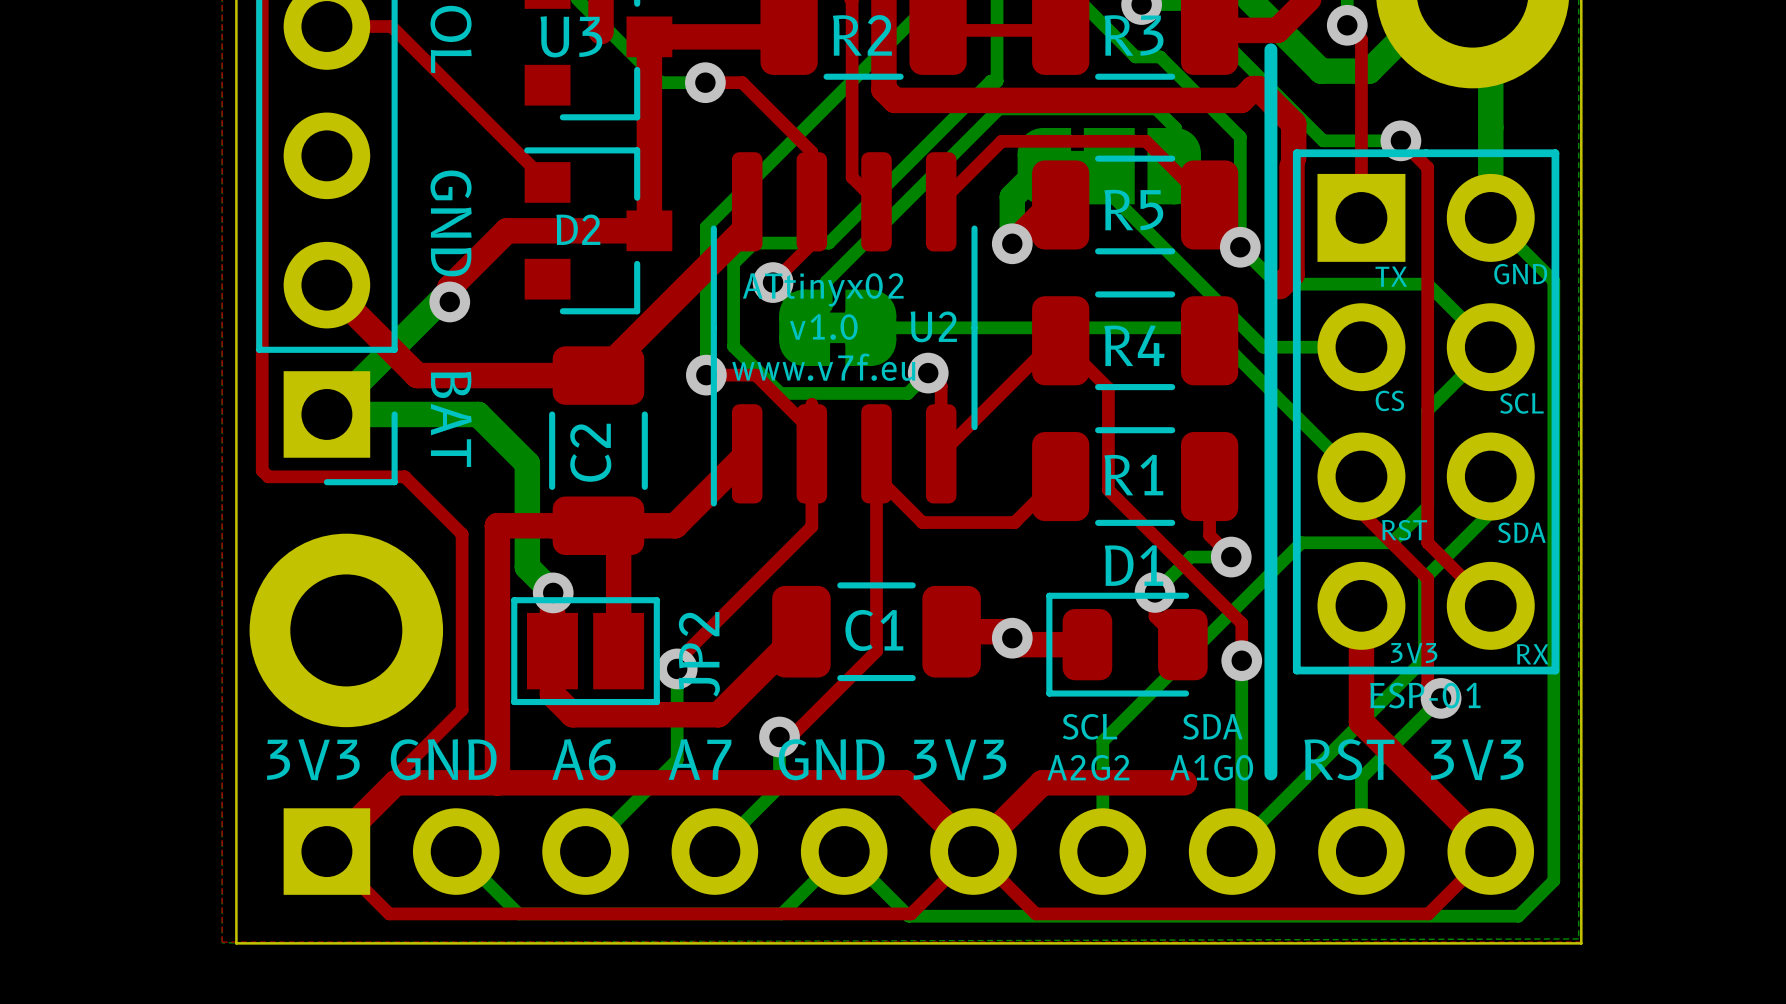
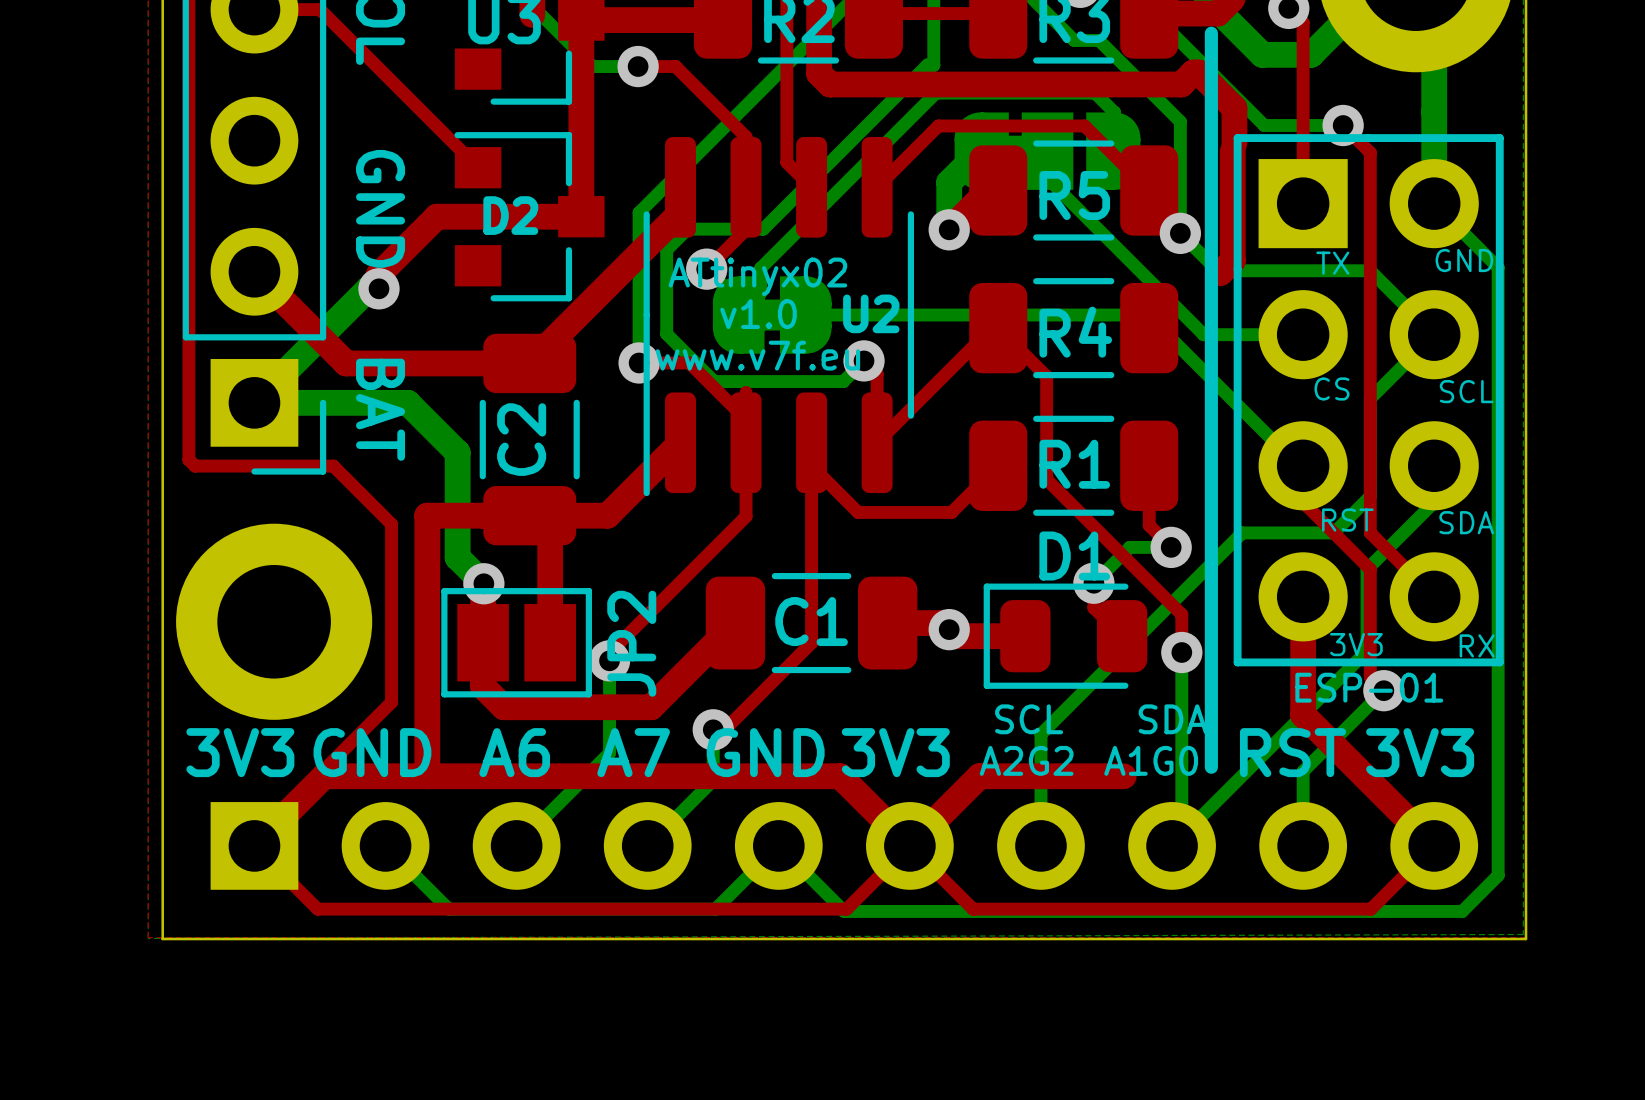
text position: SDA (1212, 726) -> SDA (1173, 719)

